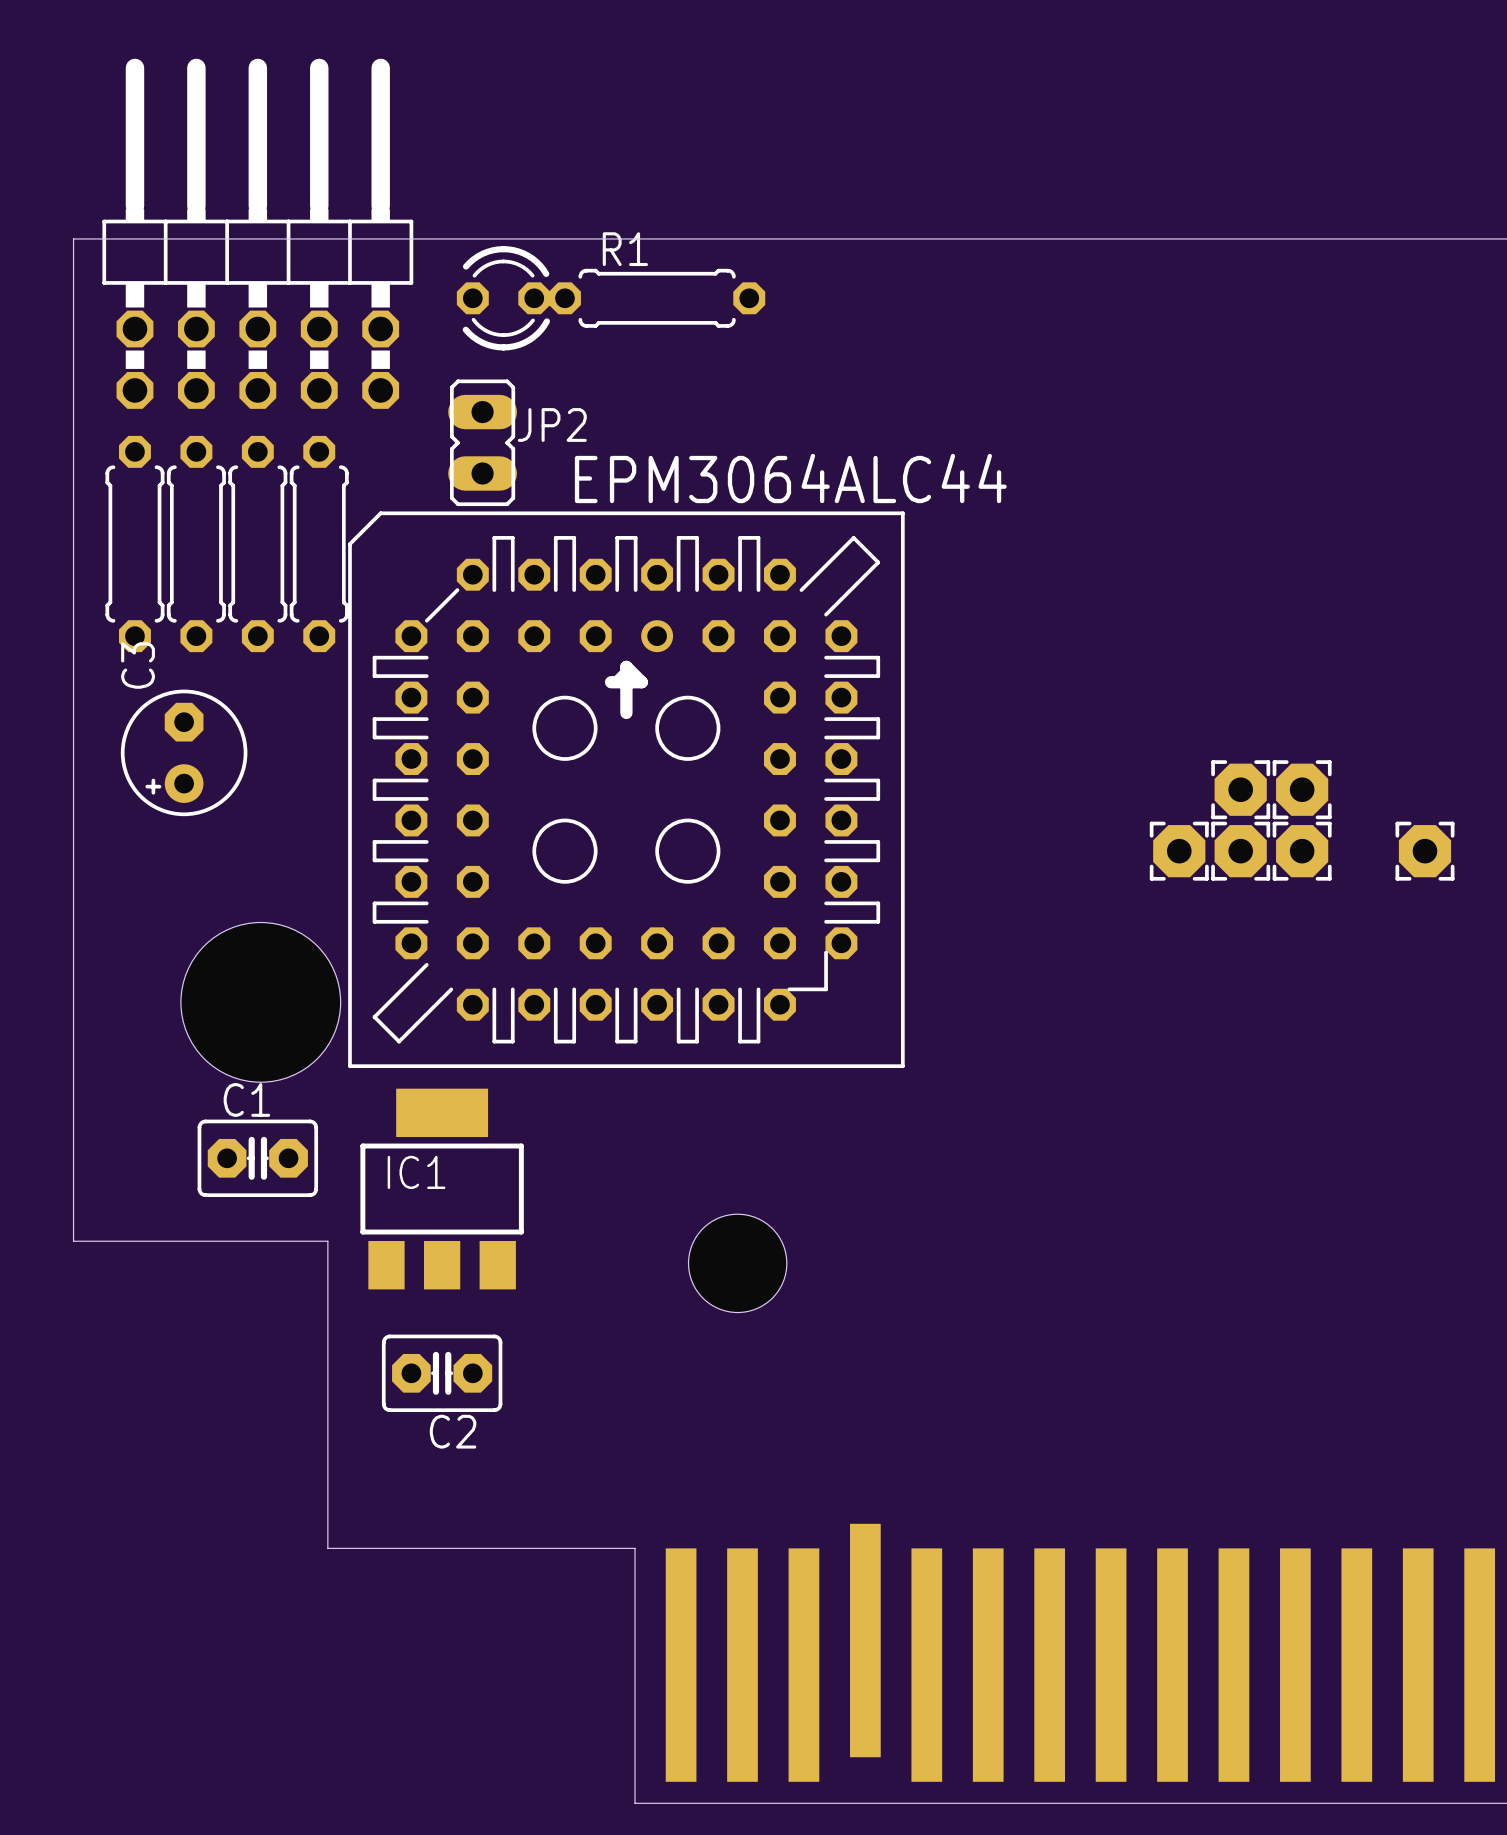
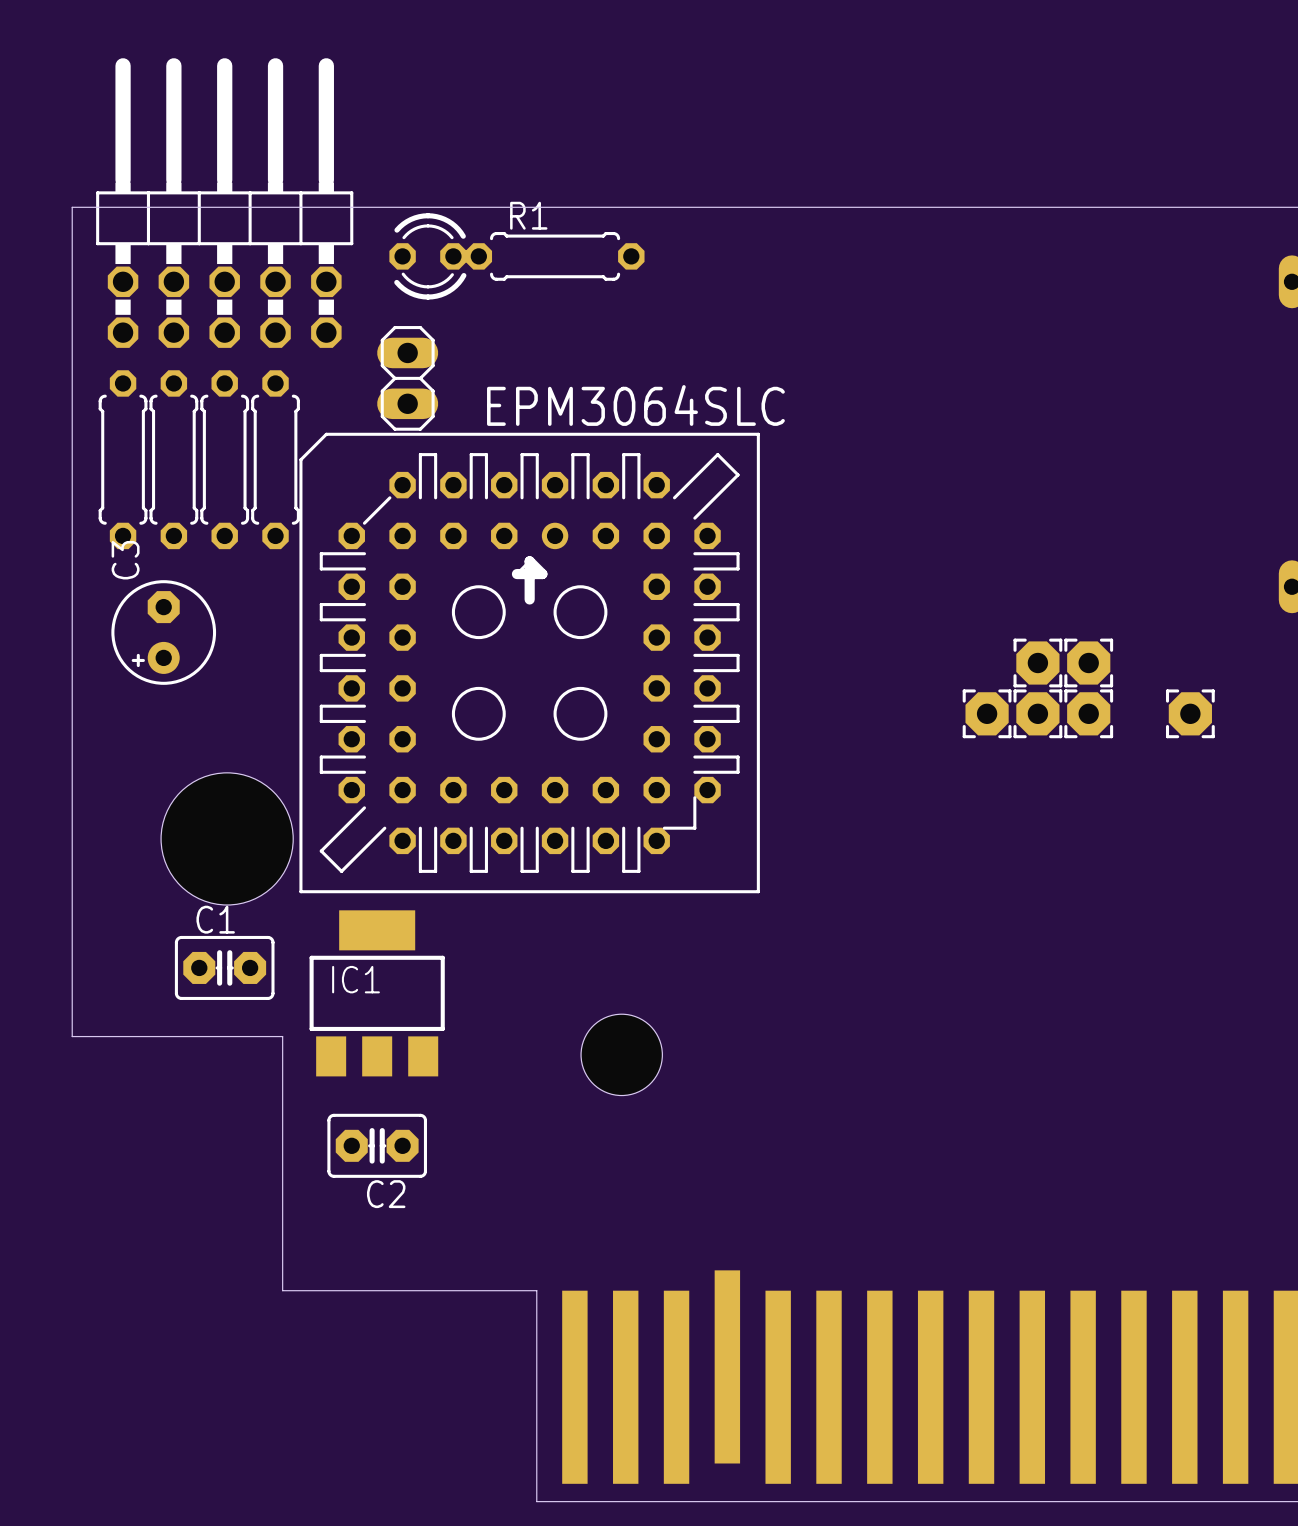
JP2: (482, 442) -> none
part: none -> (407, 378)
EPM3064ALC44 name: EPM3064ALC44 (790, 478) -> EPM3064SLC (635, 405)

